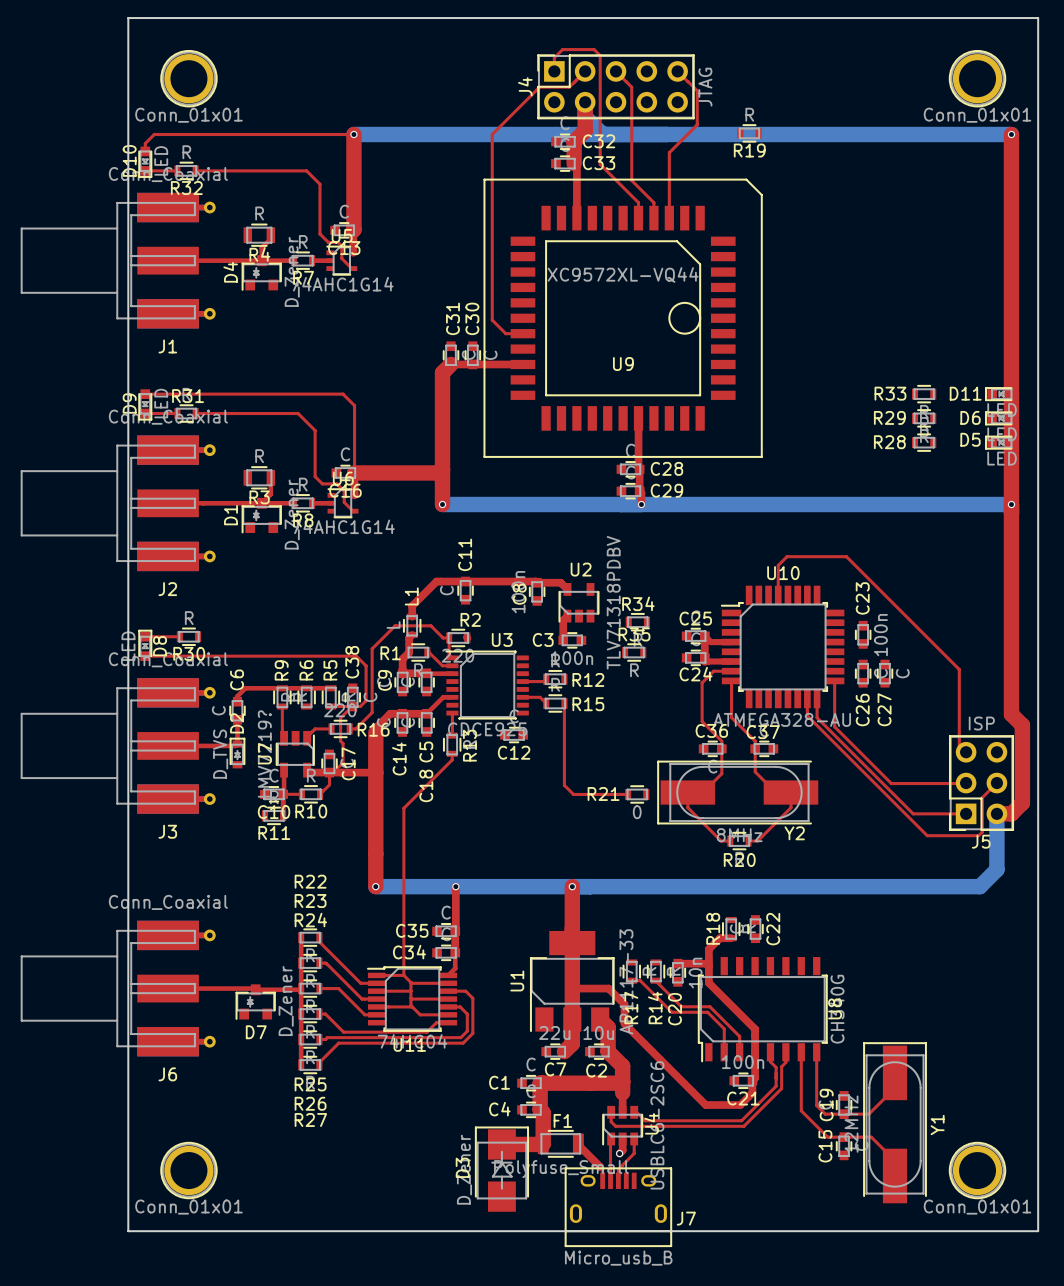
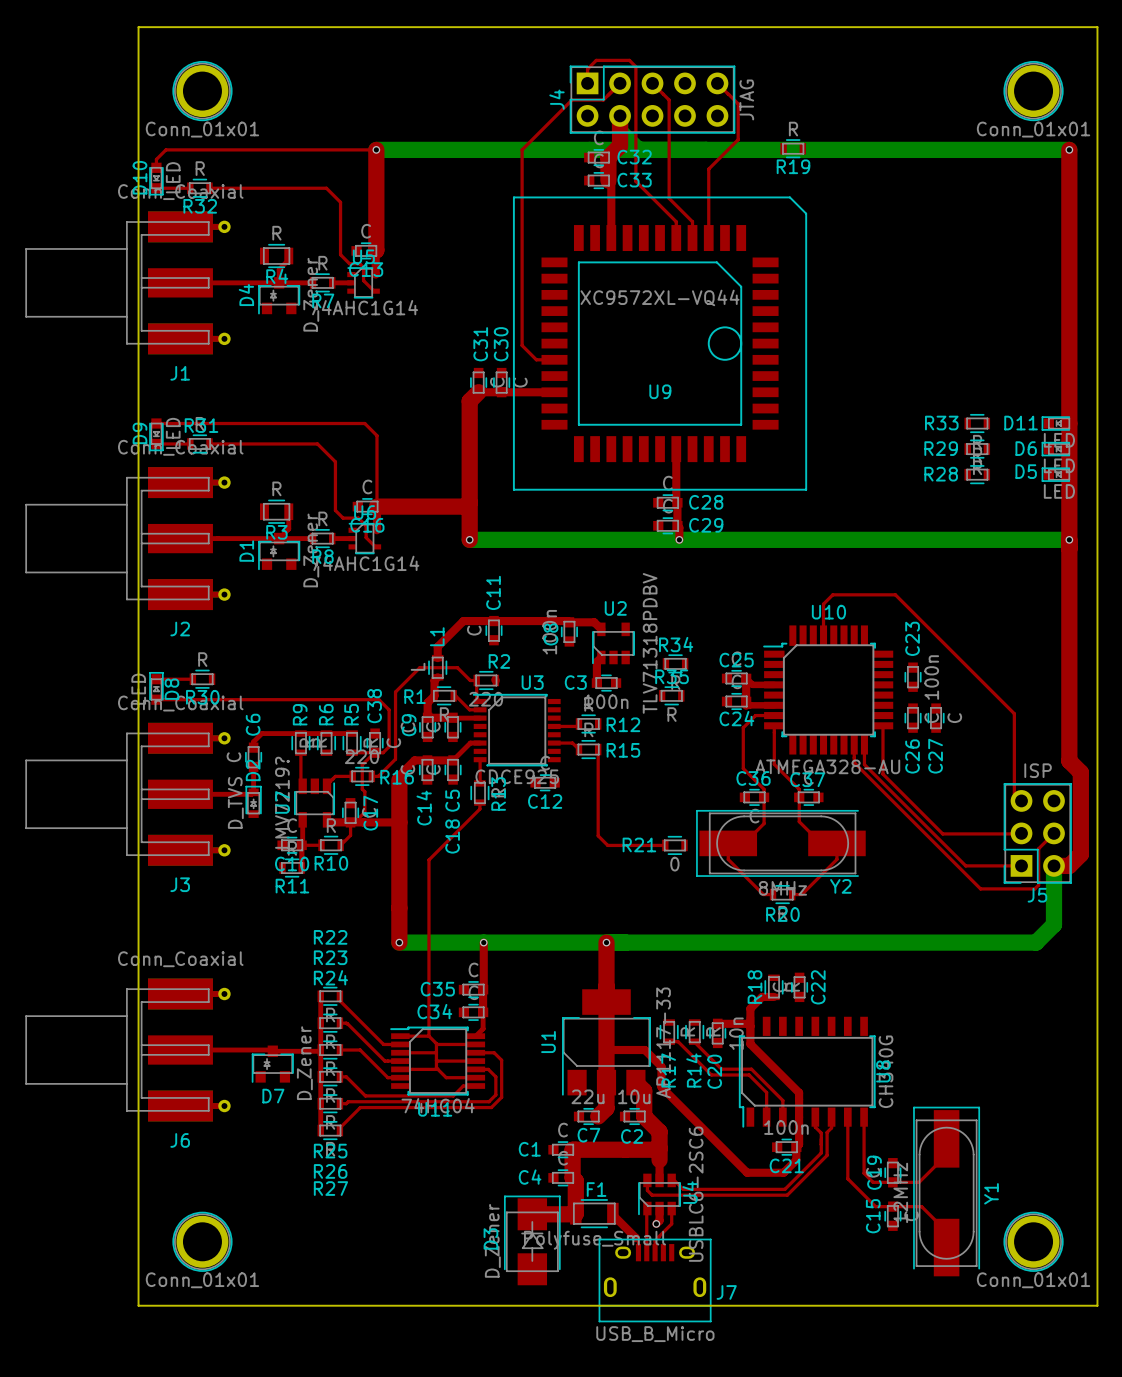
J7 value: Micro_usb_B (618, 1258) -> USB_B_Micro (655, 1334)

